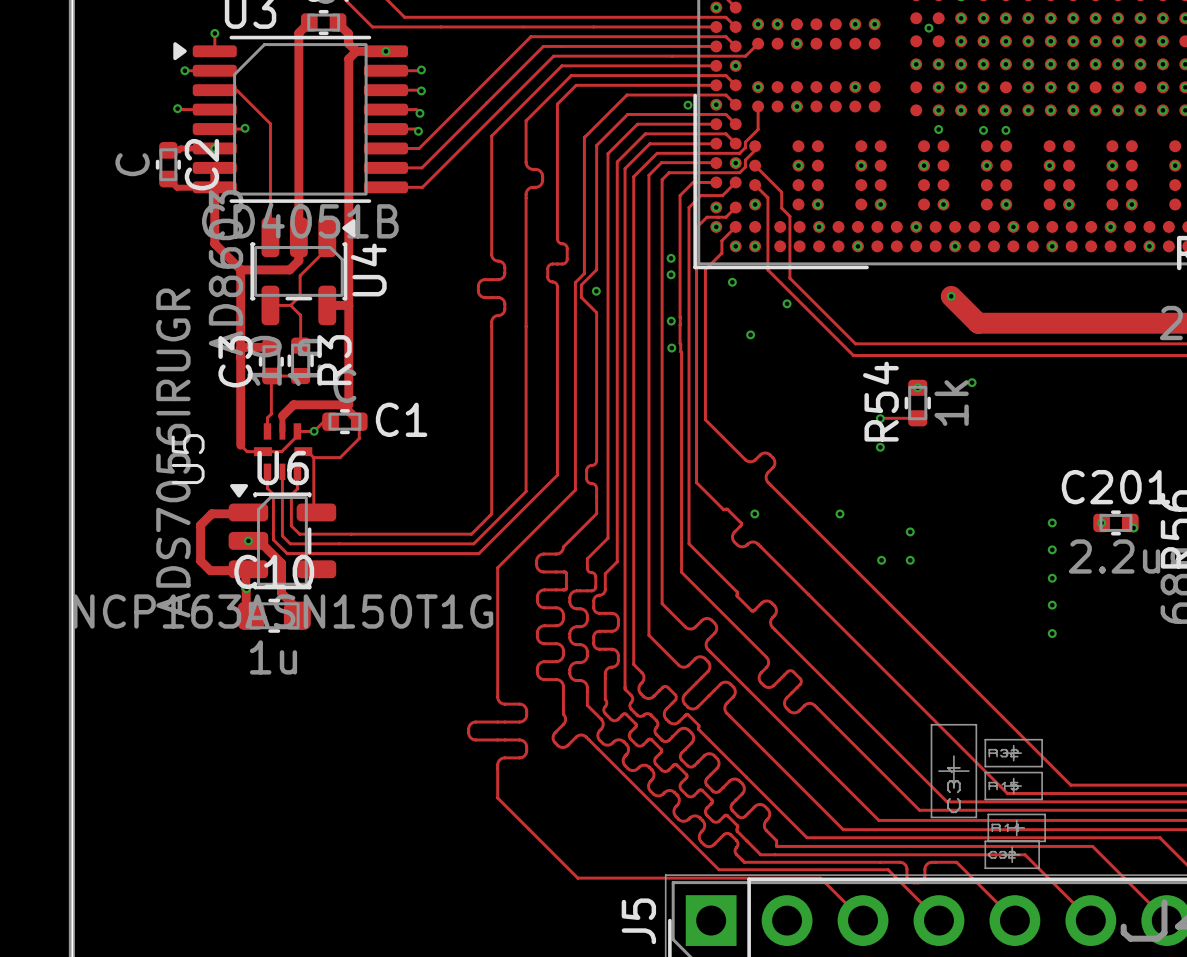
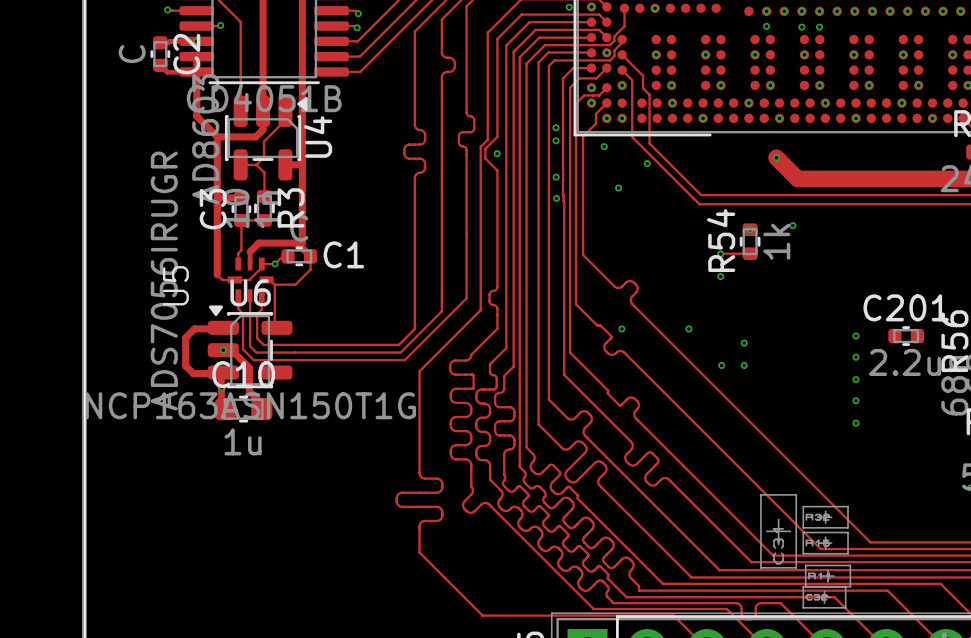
via: (1101, 522) -> none
via: (1133, 528) -> none

